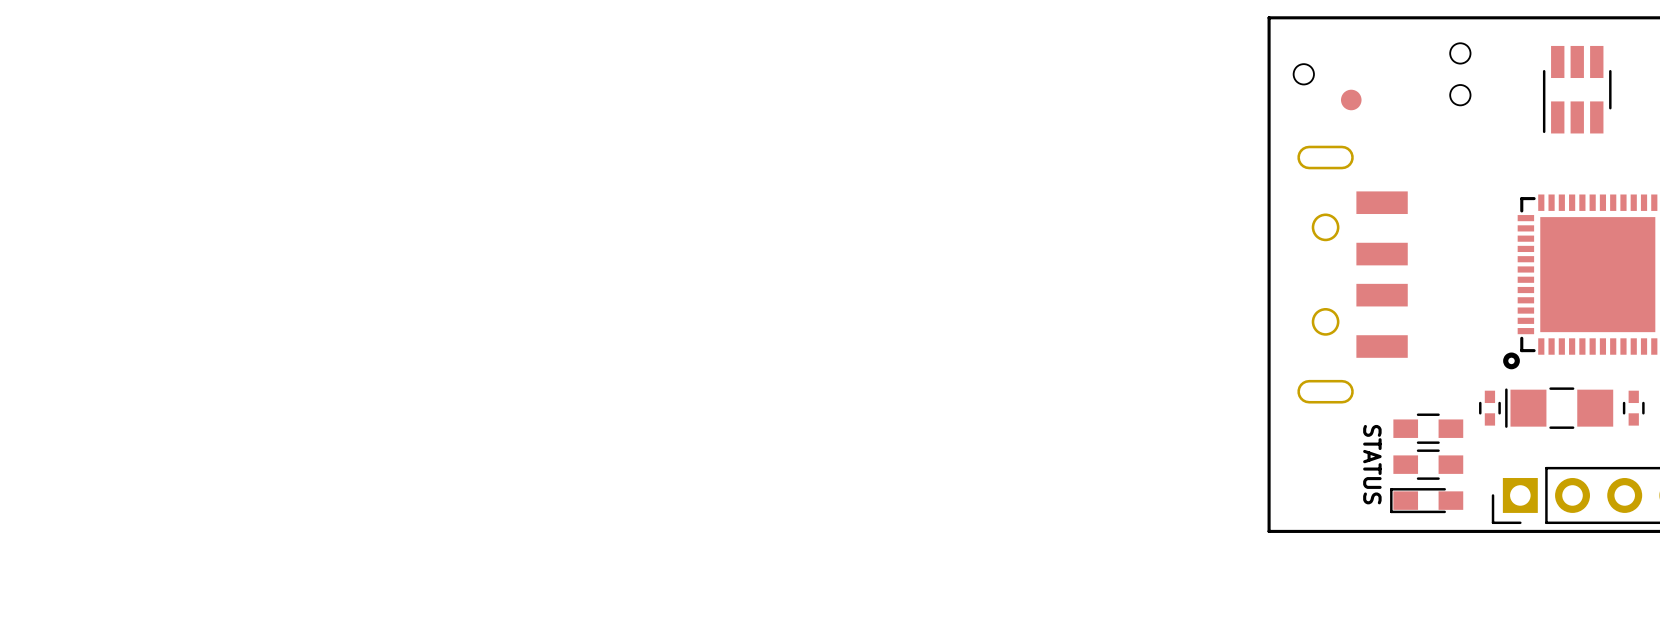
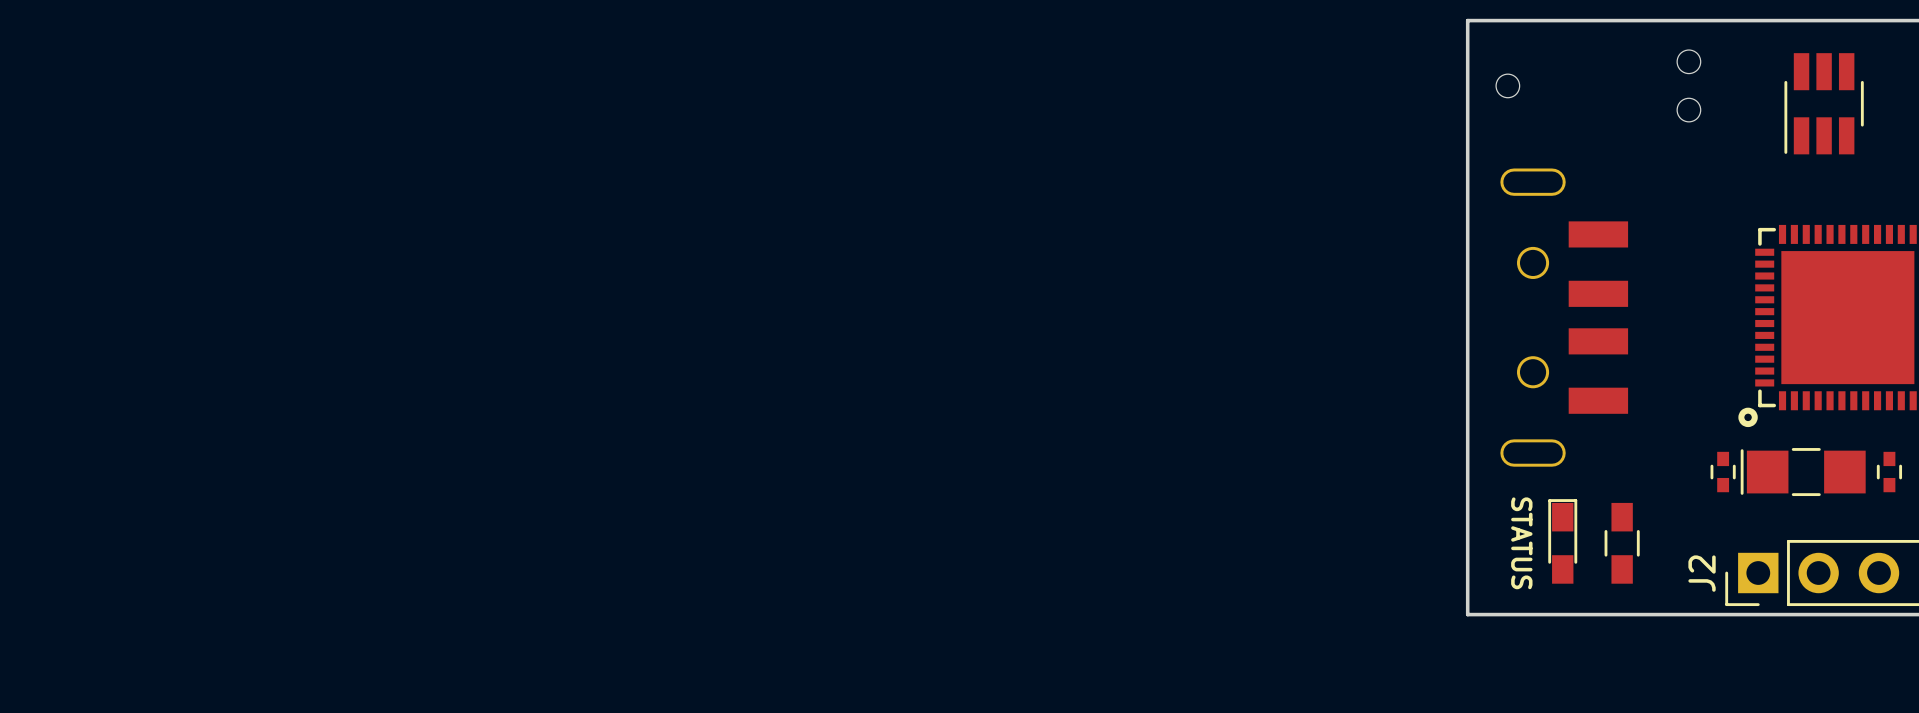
part: (1351, 99) -> none
part: (1428, 428) -> none
text position: STATUS (1372, 464) -> STATUS (1521, 543)
part: (1428, 464) -> none
part: none -> (1622, 543)
J2 name: none -> J2 (1702, 573)
part rotation: 0° (1426, 500) -> 90° clockwise (1562, 541)
part position: (1426, 500) -> (1562, 541)

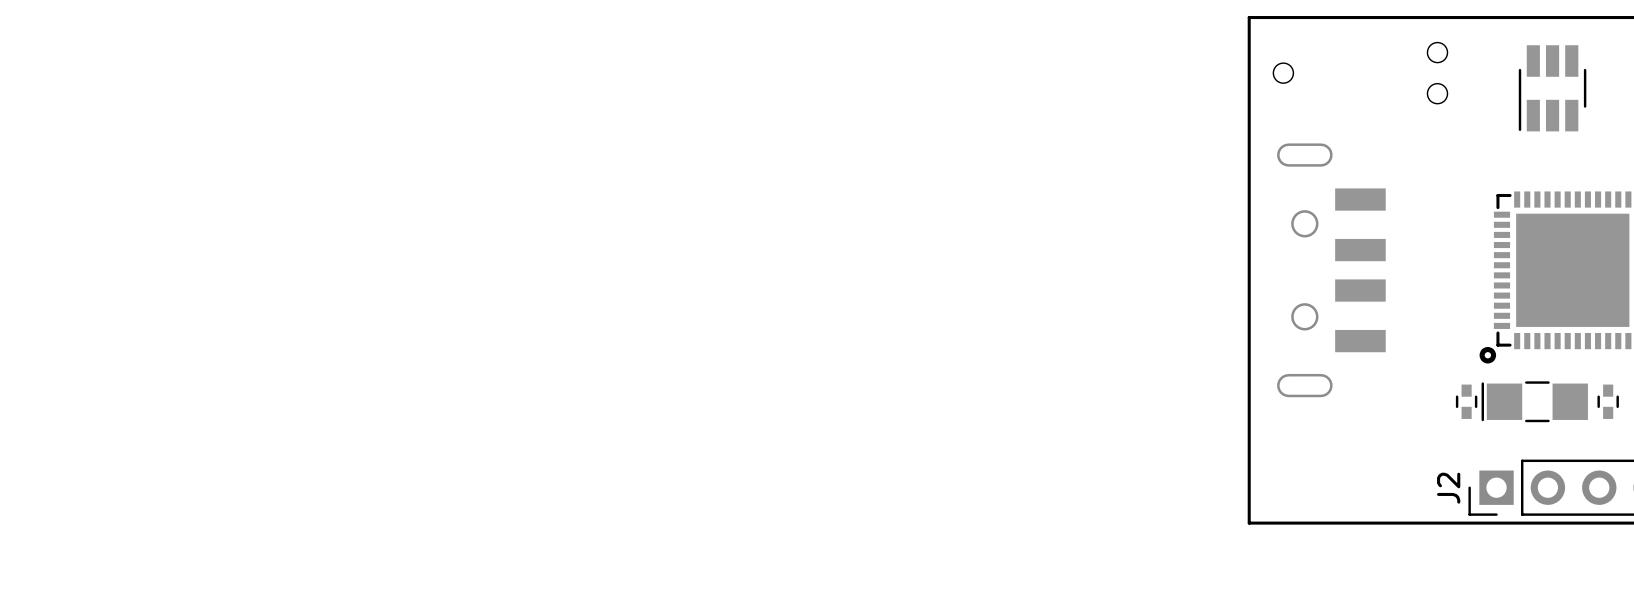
part: (1562, 541) -> none
text: STATUS (1521, 543) -> none
part: (1622, 543) -> none

